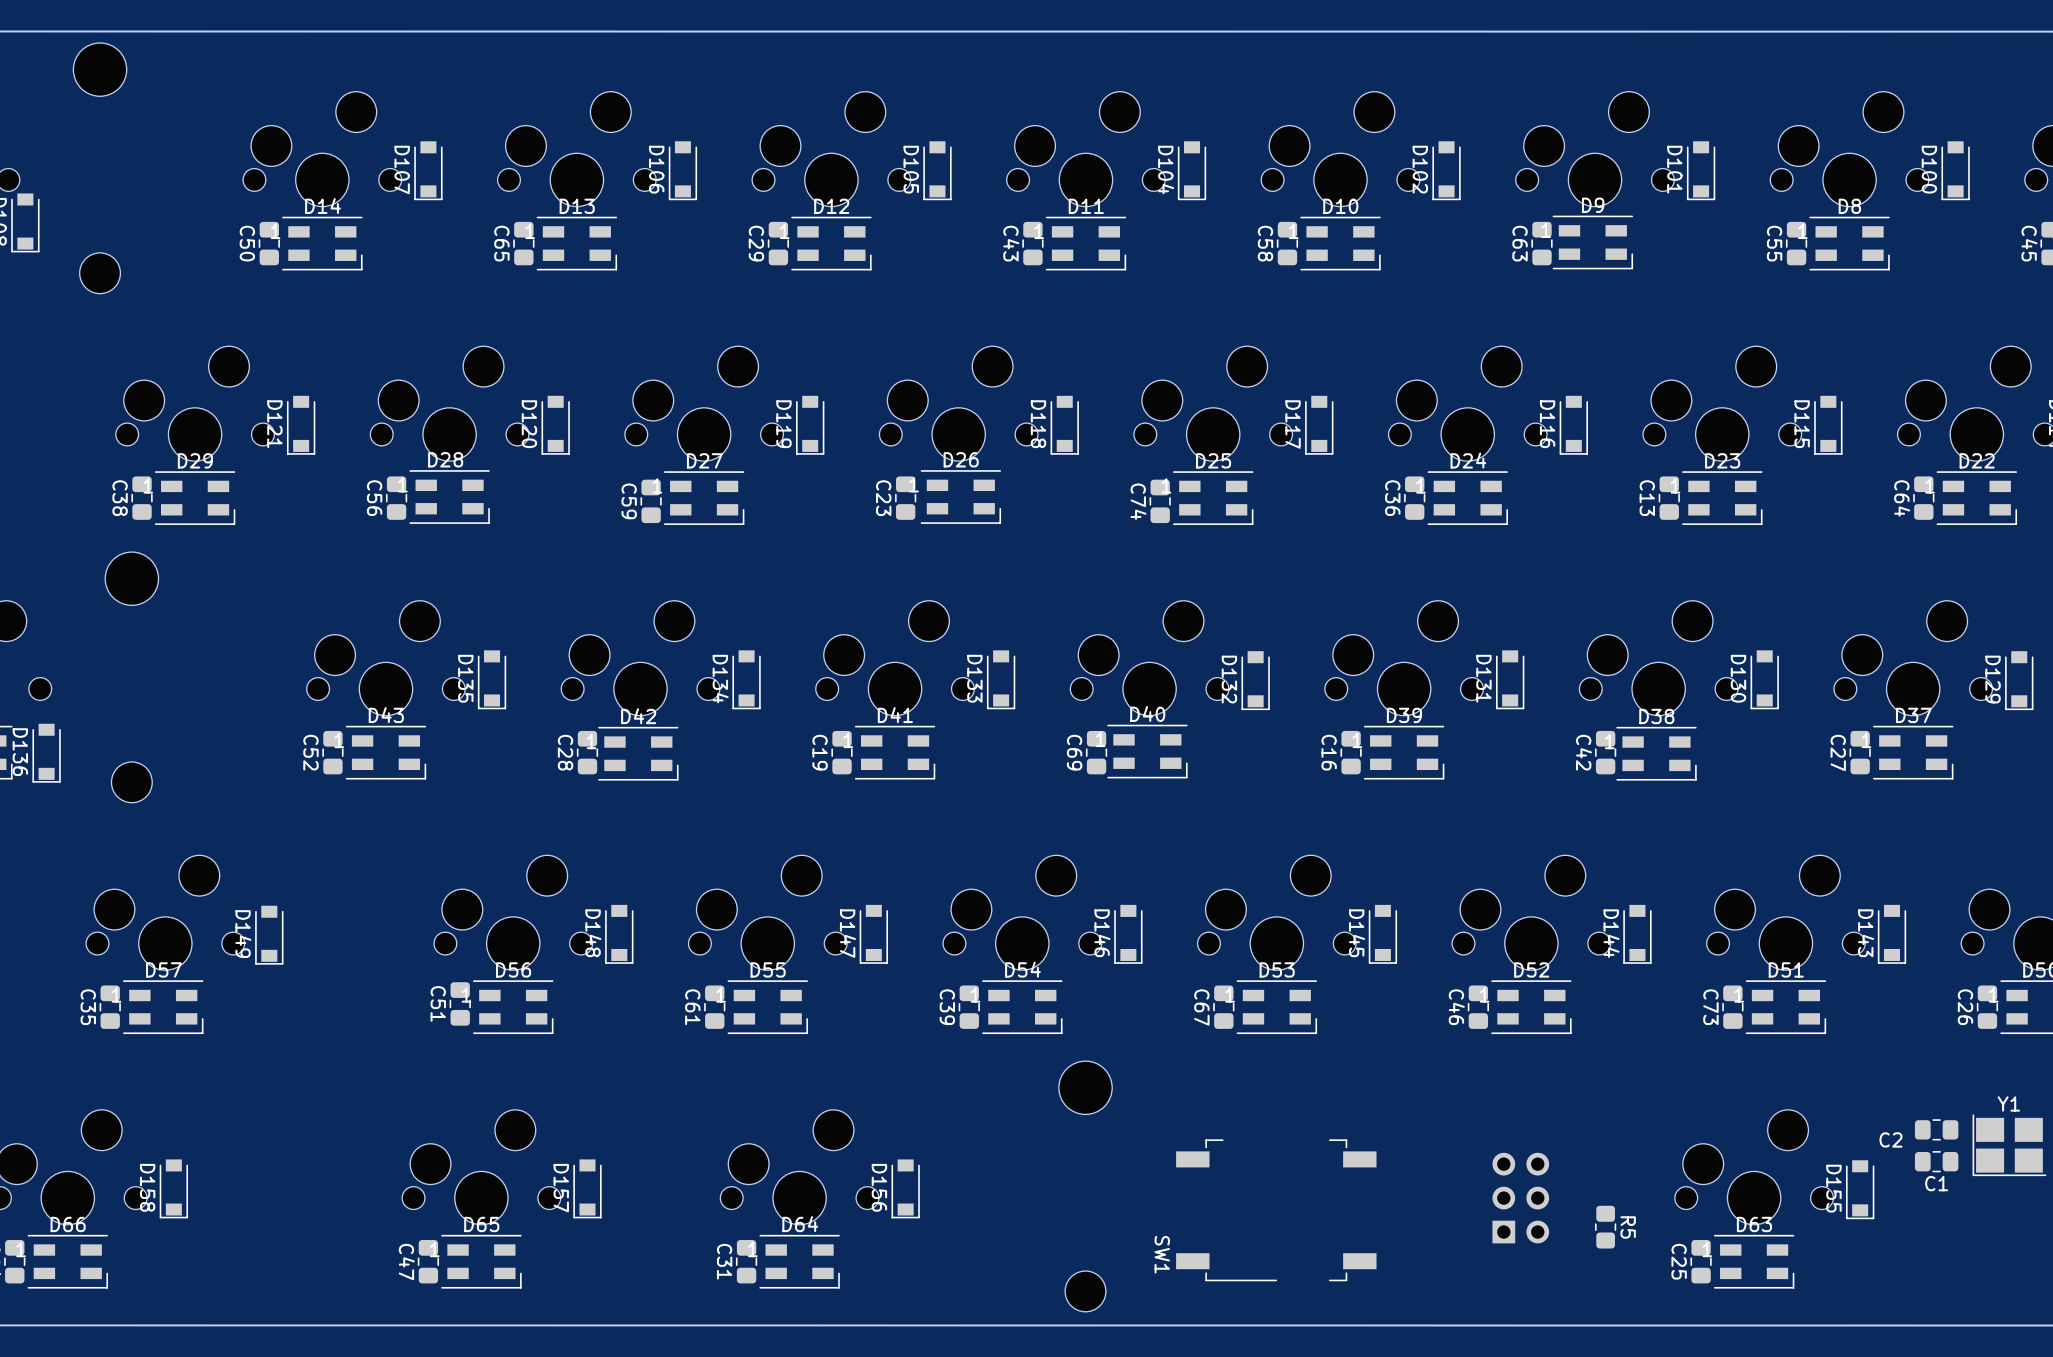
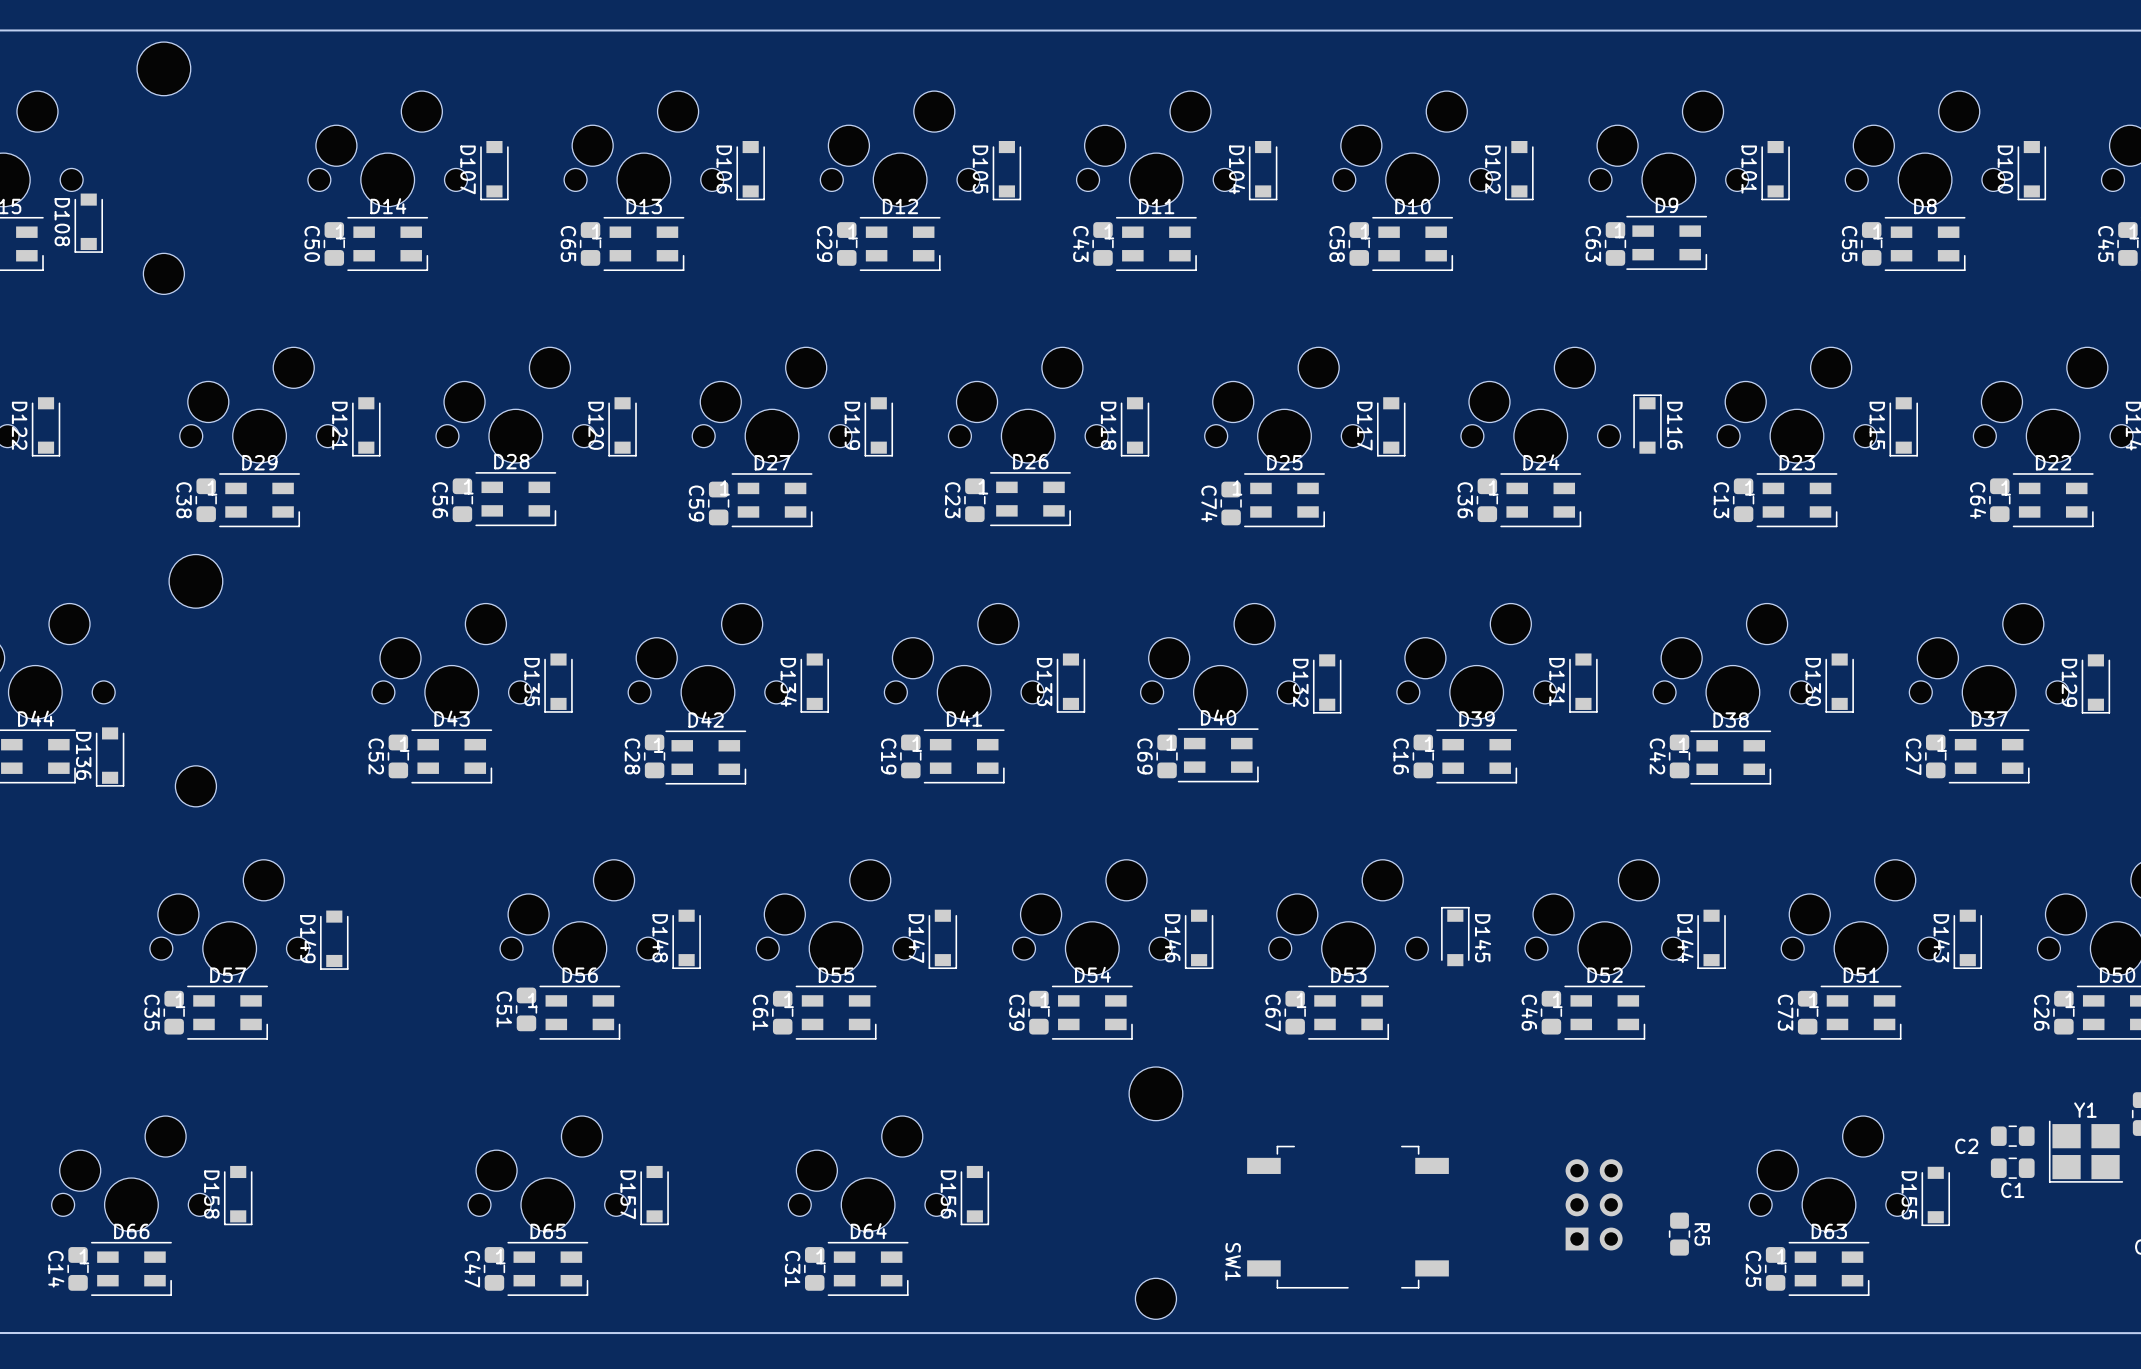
D116 rotation: 0° (1573, 425) -> 180° (1647, 424)
D145 rotation: 0° (1382, 934) -> 180° (1455, 936)

